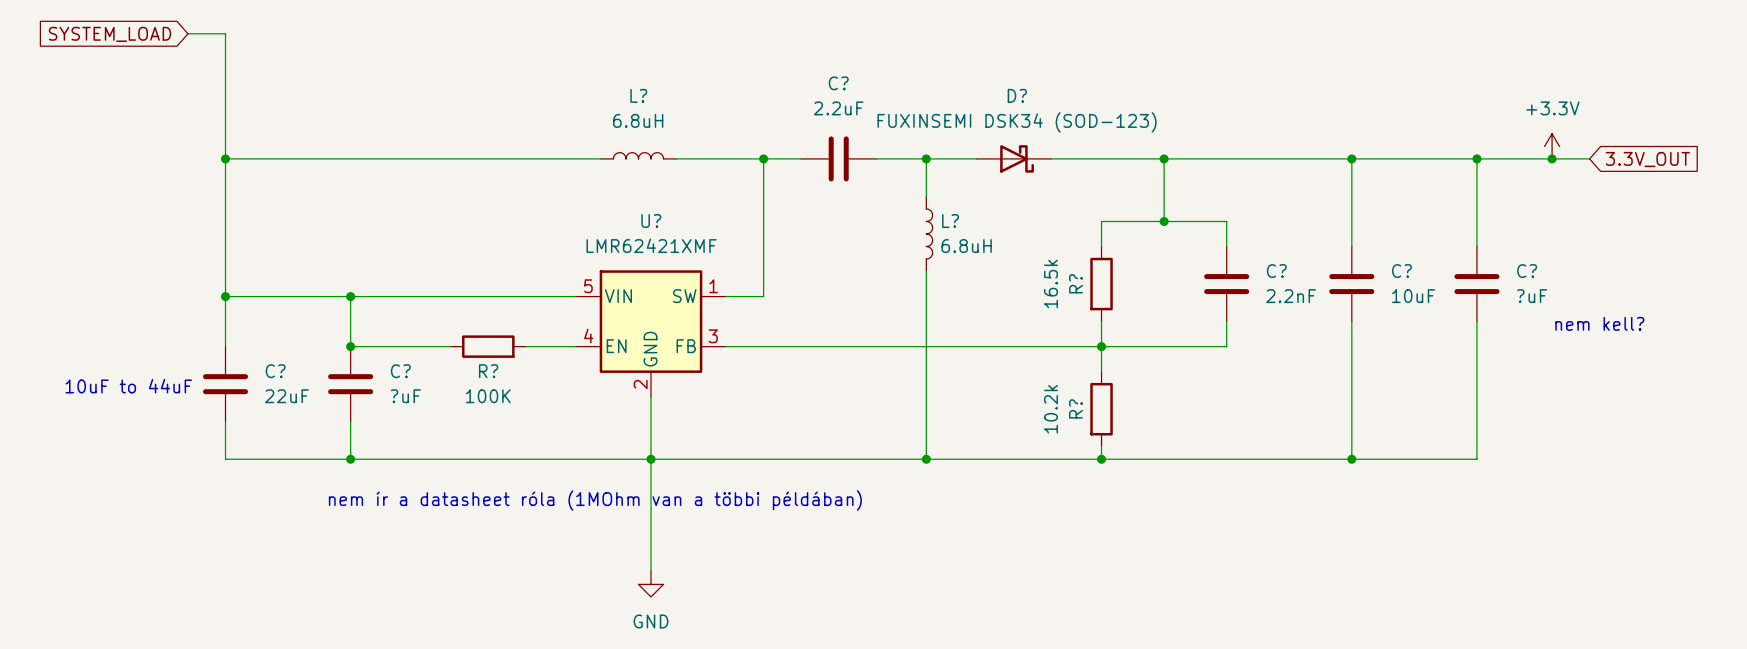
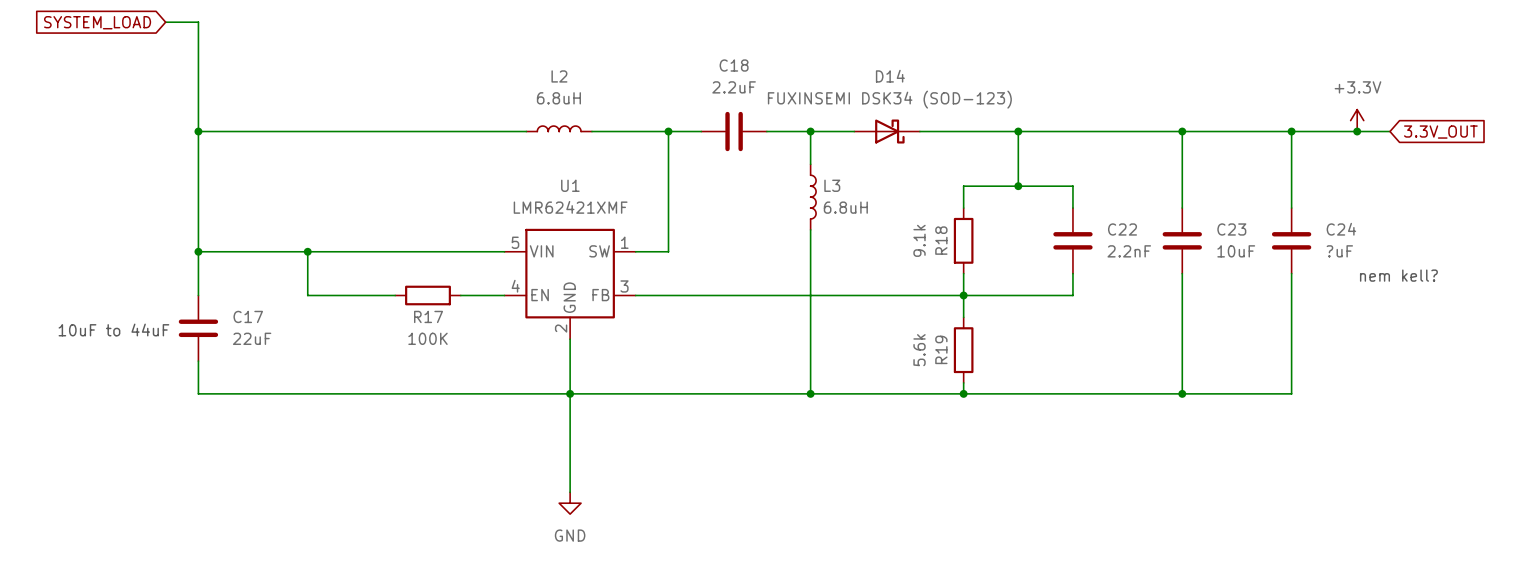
C? name: C? (838, 83) -> C18 (734, 65)
L? name: L? (638, 95) -> L2 (559, 76)
D? name: D? (1017, 95) -> D14 (890, 76)
U? name: U? (651, 221) -> U1 (570, 185)
L? name: L? (950, 221) -> L3 (832, 185)
C? name: C? (1276, 271) -> C22 (1122, 229)
C? name: C? (1401, 271) -> C23 (1231, 229)
C? name: C? (1527, 271) -> C24 (1341, 229)
R? name: R? (1076, 283) -> R18 (941, 240)
R? value: 16.5k (1051, 284) -> 9.1k (919, 240)
junction: (350, 346) -> none
C? name: C? (275, 371) -> C17 (248, 316)
R? name: R? (488, 371) -> R17 (428, 316)
C?: ?uF (350, 384) -> none
R? name: R? (1076, 408) -> R19 (941, 349)
R? value: 10.2k (1051, 409) -> 5.6k (919, 350)
wire: (350, 421) (350, 459) -> none
junction: (350, 459) -> none
text: nem ír a datasheet róla (1MOhm van a többi példában) (595, 500) -> none

